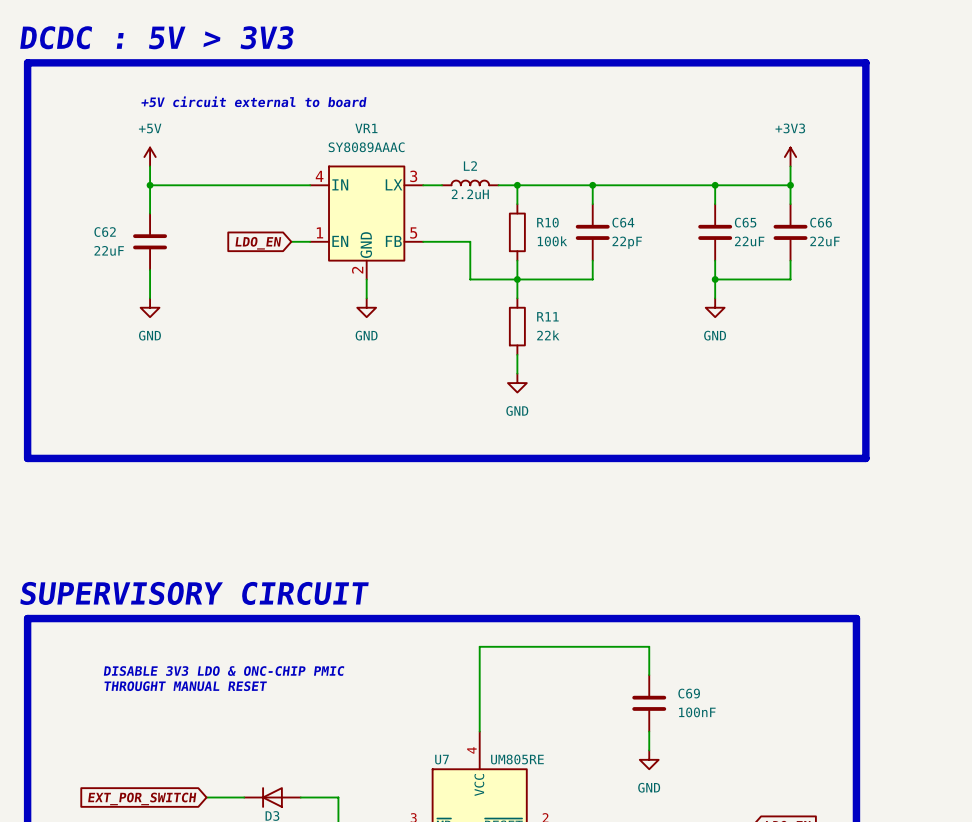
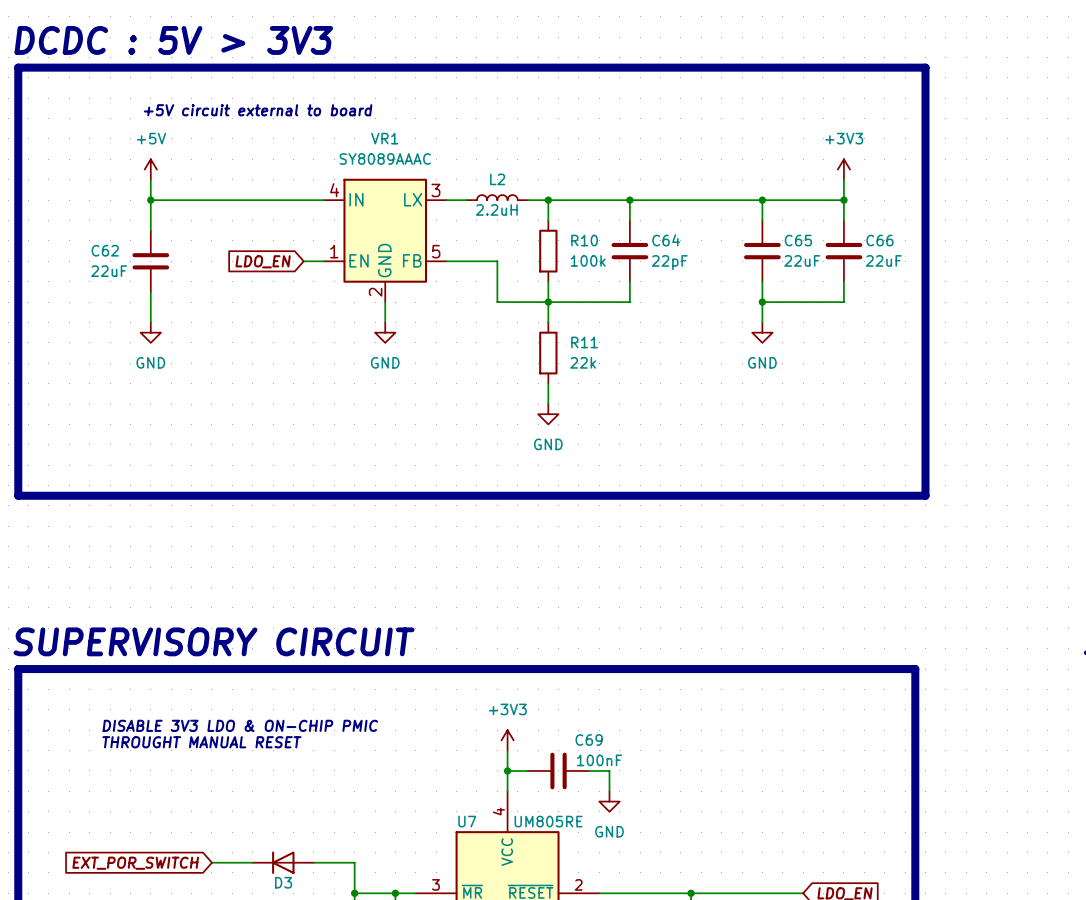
text: DISABLE 3V3 LDO & ONC-CHIP PMIC (224, 671) -> DISABLE 3V3 LDO & ON-CHIP PMIC (240, 725)
wire: (649, 675) (649, 646) (479, 646) (479, 693) -> none
power symbol: none -> +3V3 (507, 740)
C69 name position: C69 (689, 693) -> C69 (589, 740)
C69 rotation: 0° (649, 703) -> 90° clockwise (558, 770)
C69 position: (649, 703) -> (558, 770)
wire: none -> (507, 770) (527, 770)
junction: none -> (507, 770)
wire: none -> (589, 770) (609, 770) (609, 791)
C69 value position: 100nF (697, 712) -> 100nF (599, 760)
wire: (649, 731) (649, 750) -> none
power symbol position: GND (649, 759) -> GND (609, 801)

